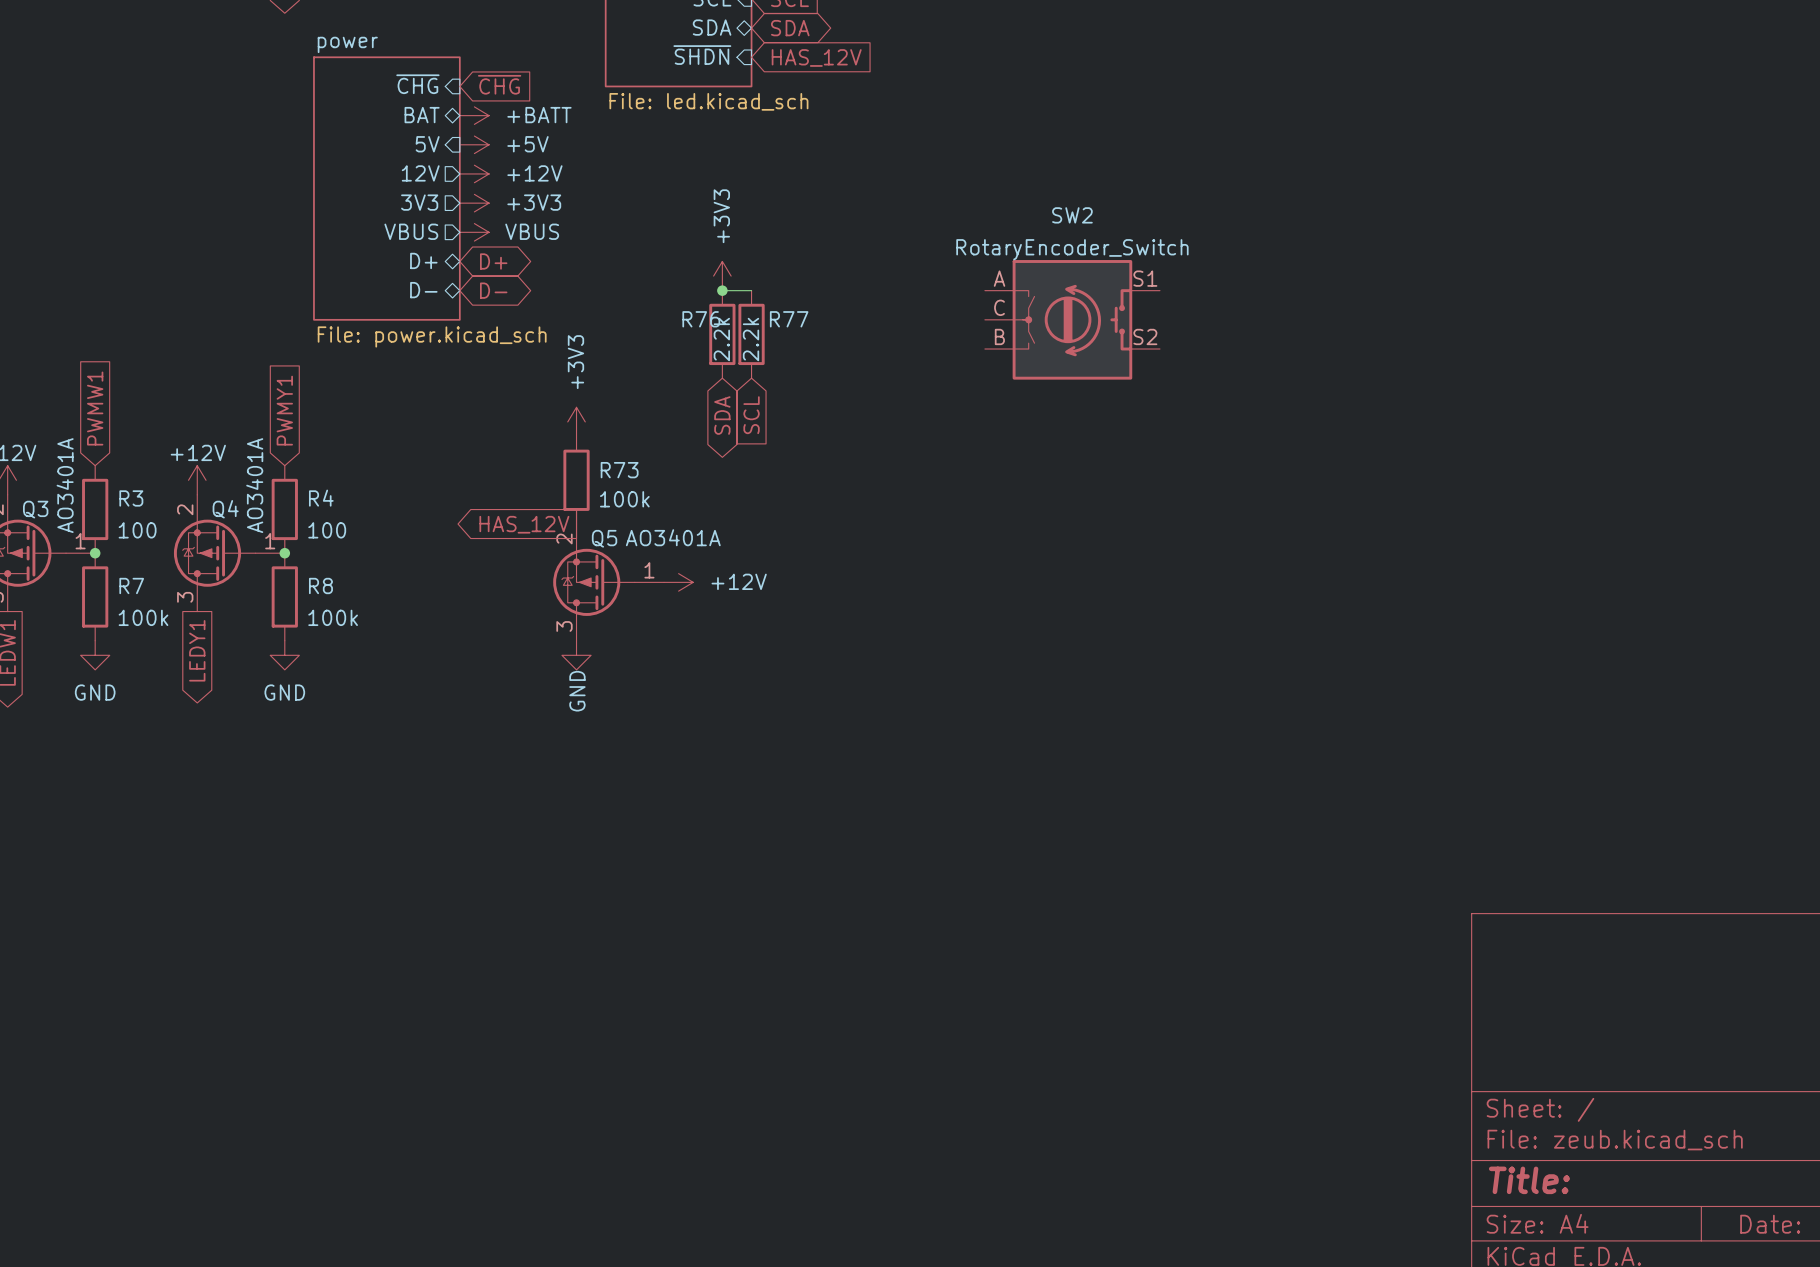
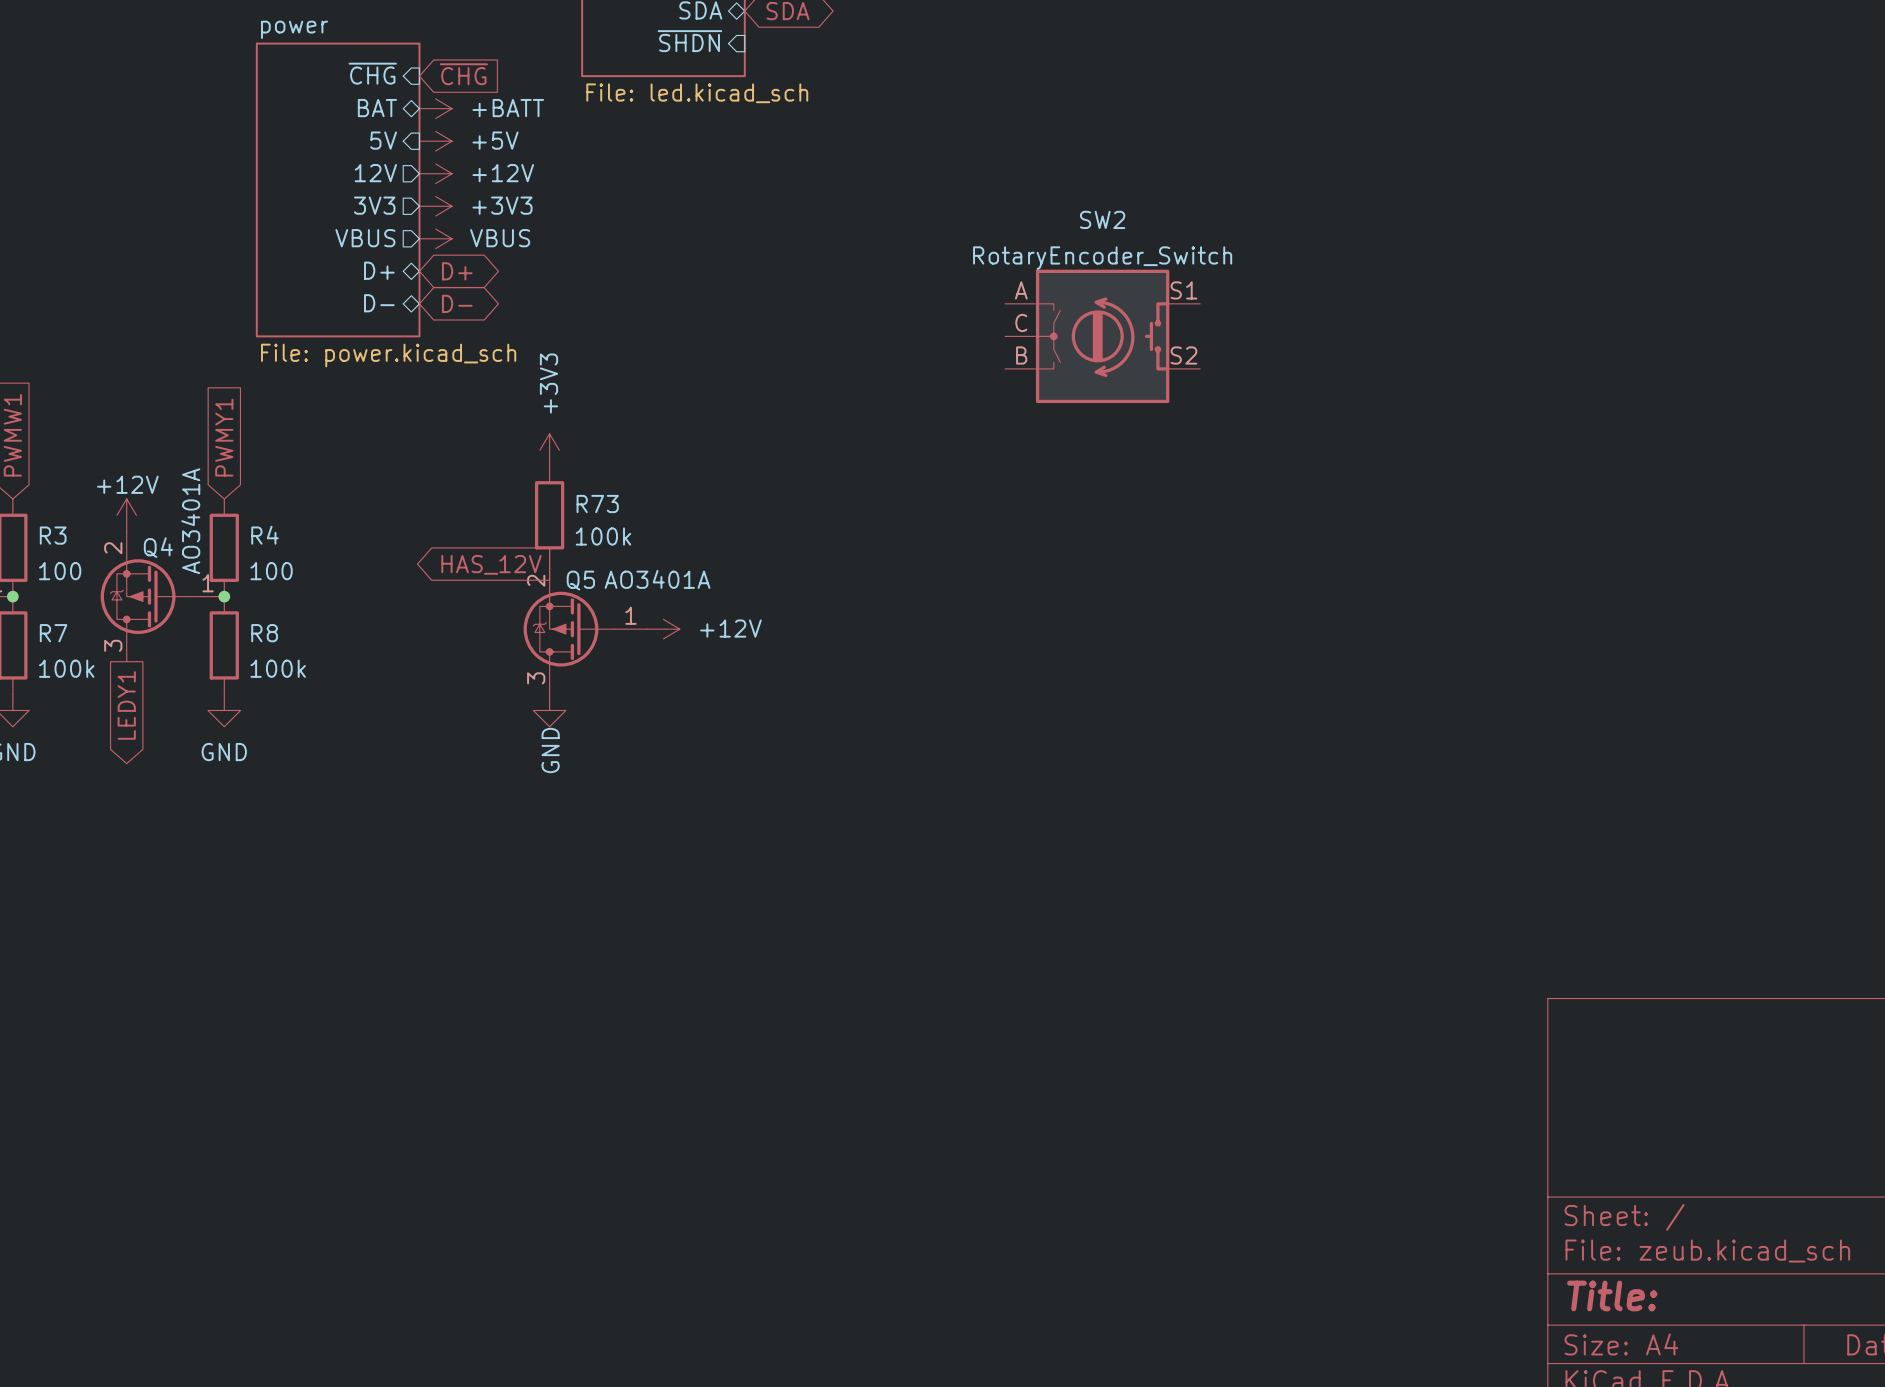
global label: HAS_12V (816, 57) -> none
power symbol: +3V3 (722, 276) -> none
wire: (722, 290) (751, 290) -> none
junction: (722, 290) -> none
R76: 2.2k (722, 334) -> none
R77: 2.2k (751, 334) -> none
global label: SDA (722, 415) -> none
global label: SCL (751, 415) -> none

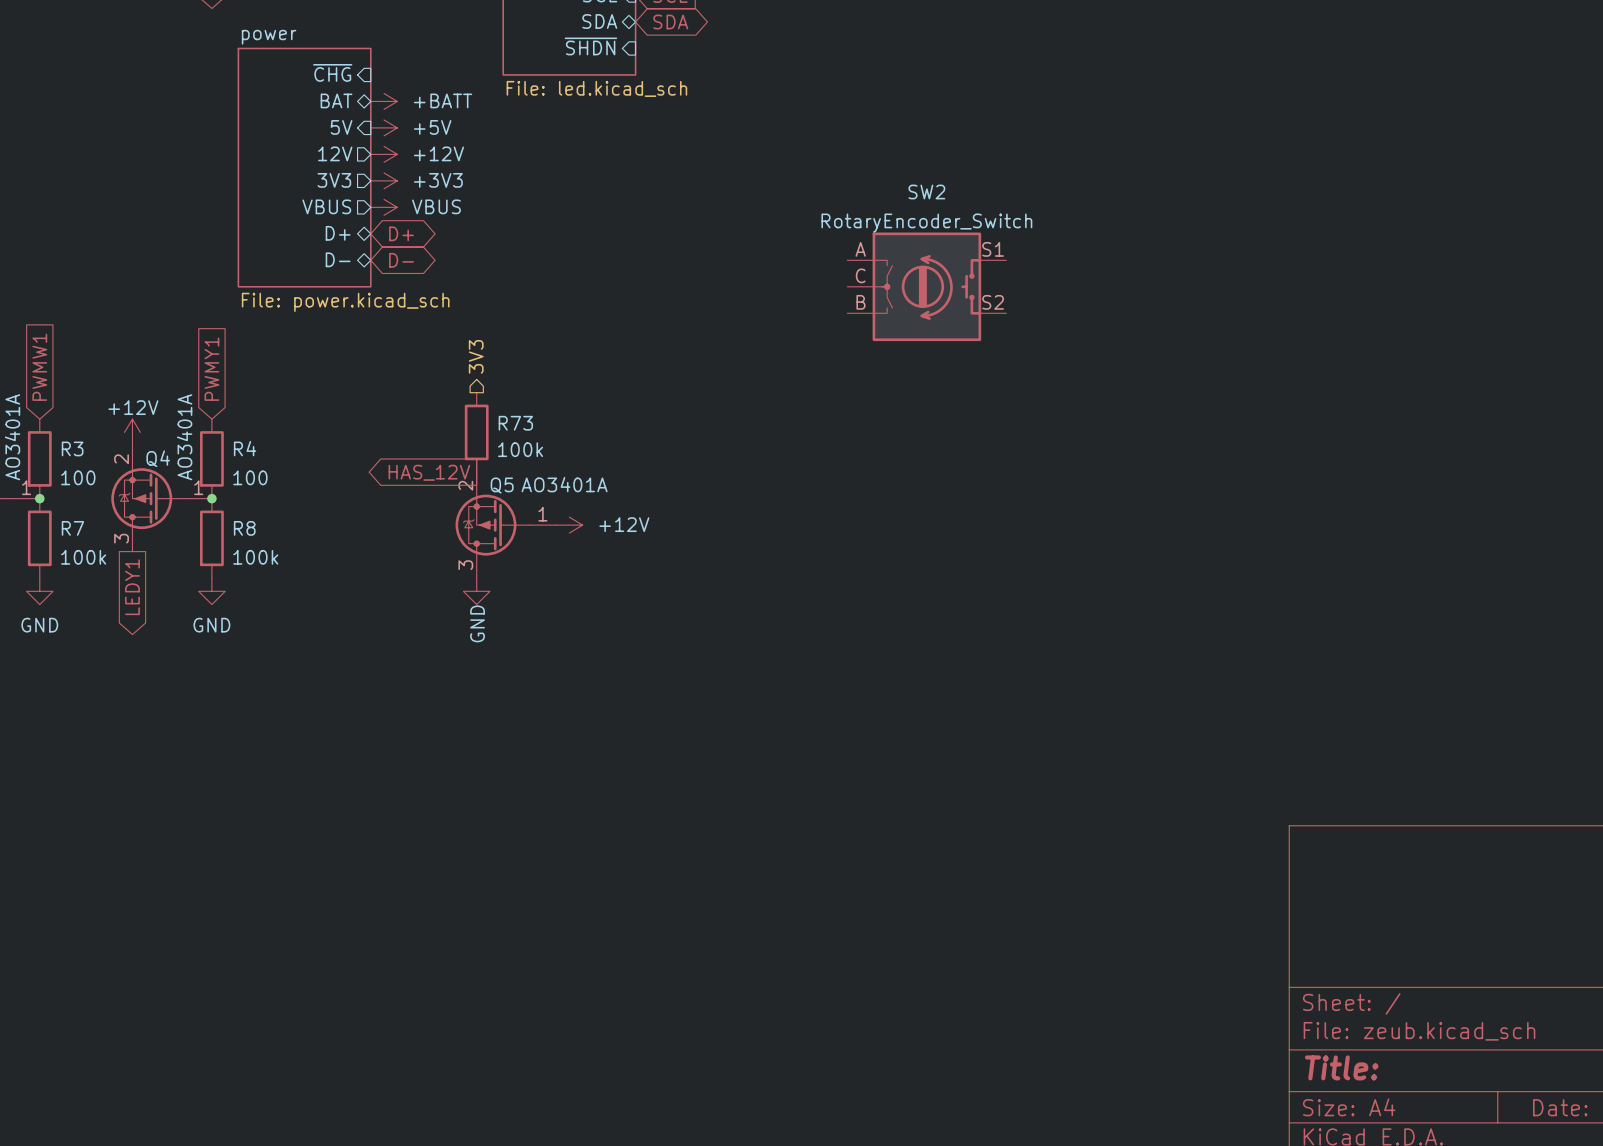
global label: ~{CHG} (463, 74) -> none
hierarchical label: none -> 3V3 (476, 356)
power symbol: +3V3 (549, 450) -> none

